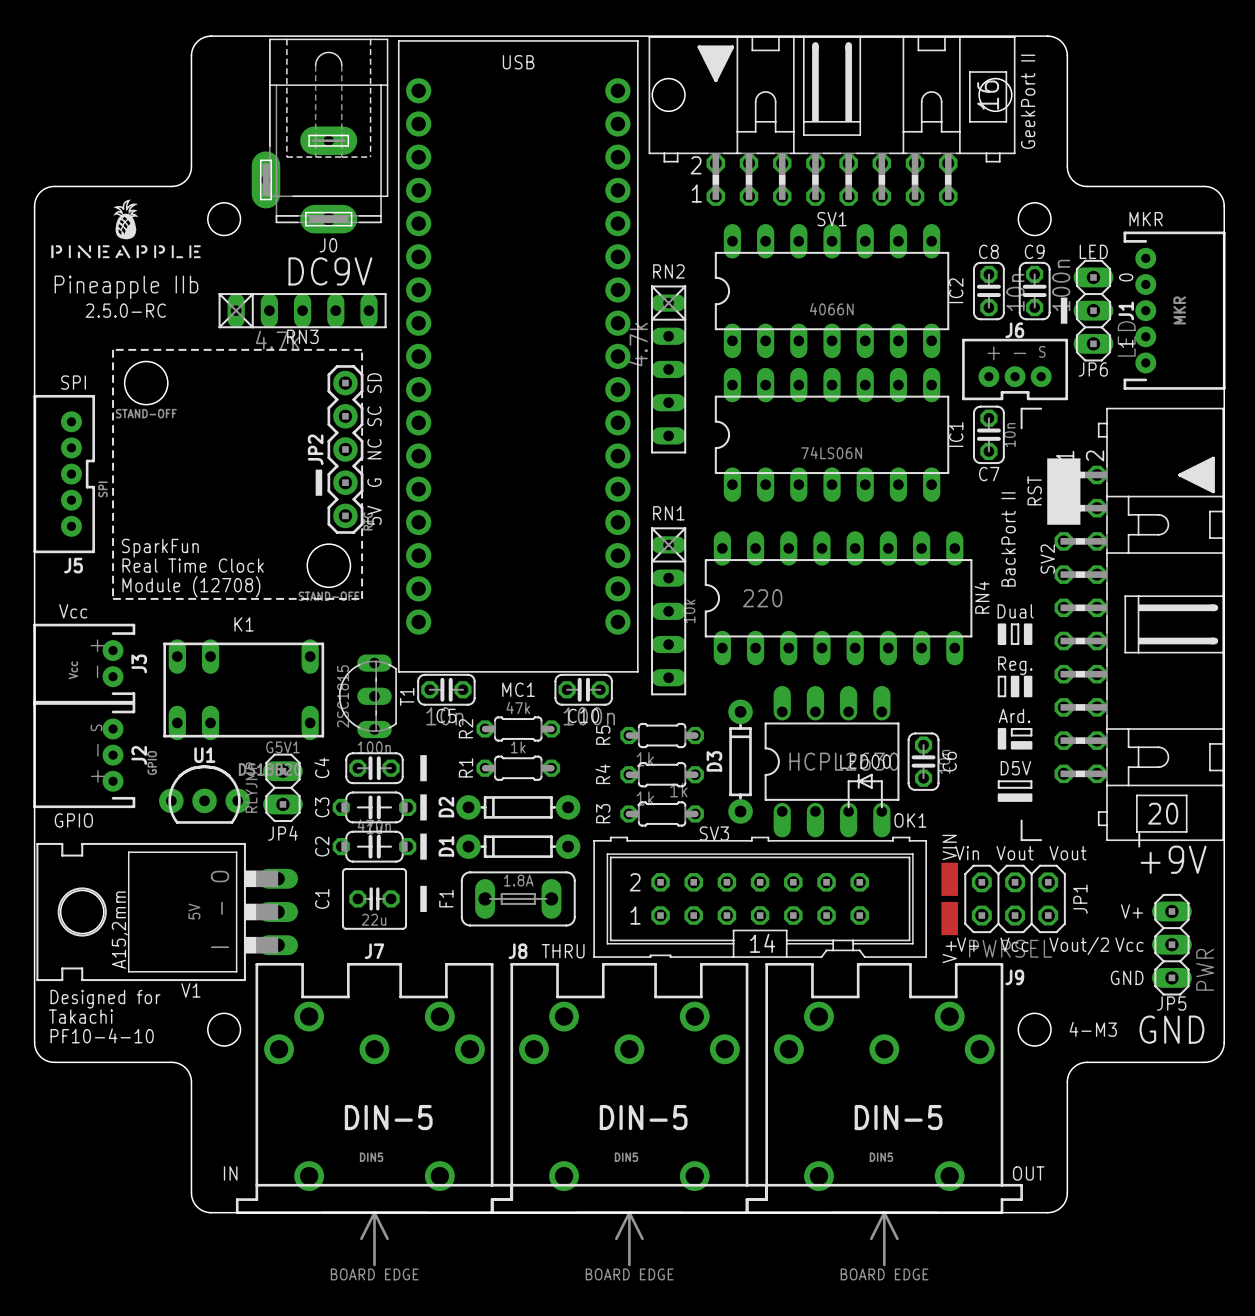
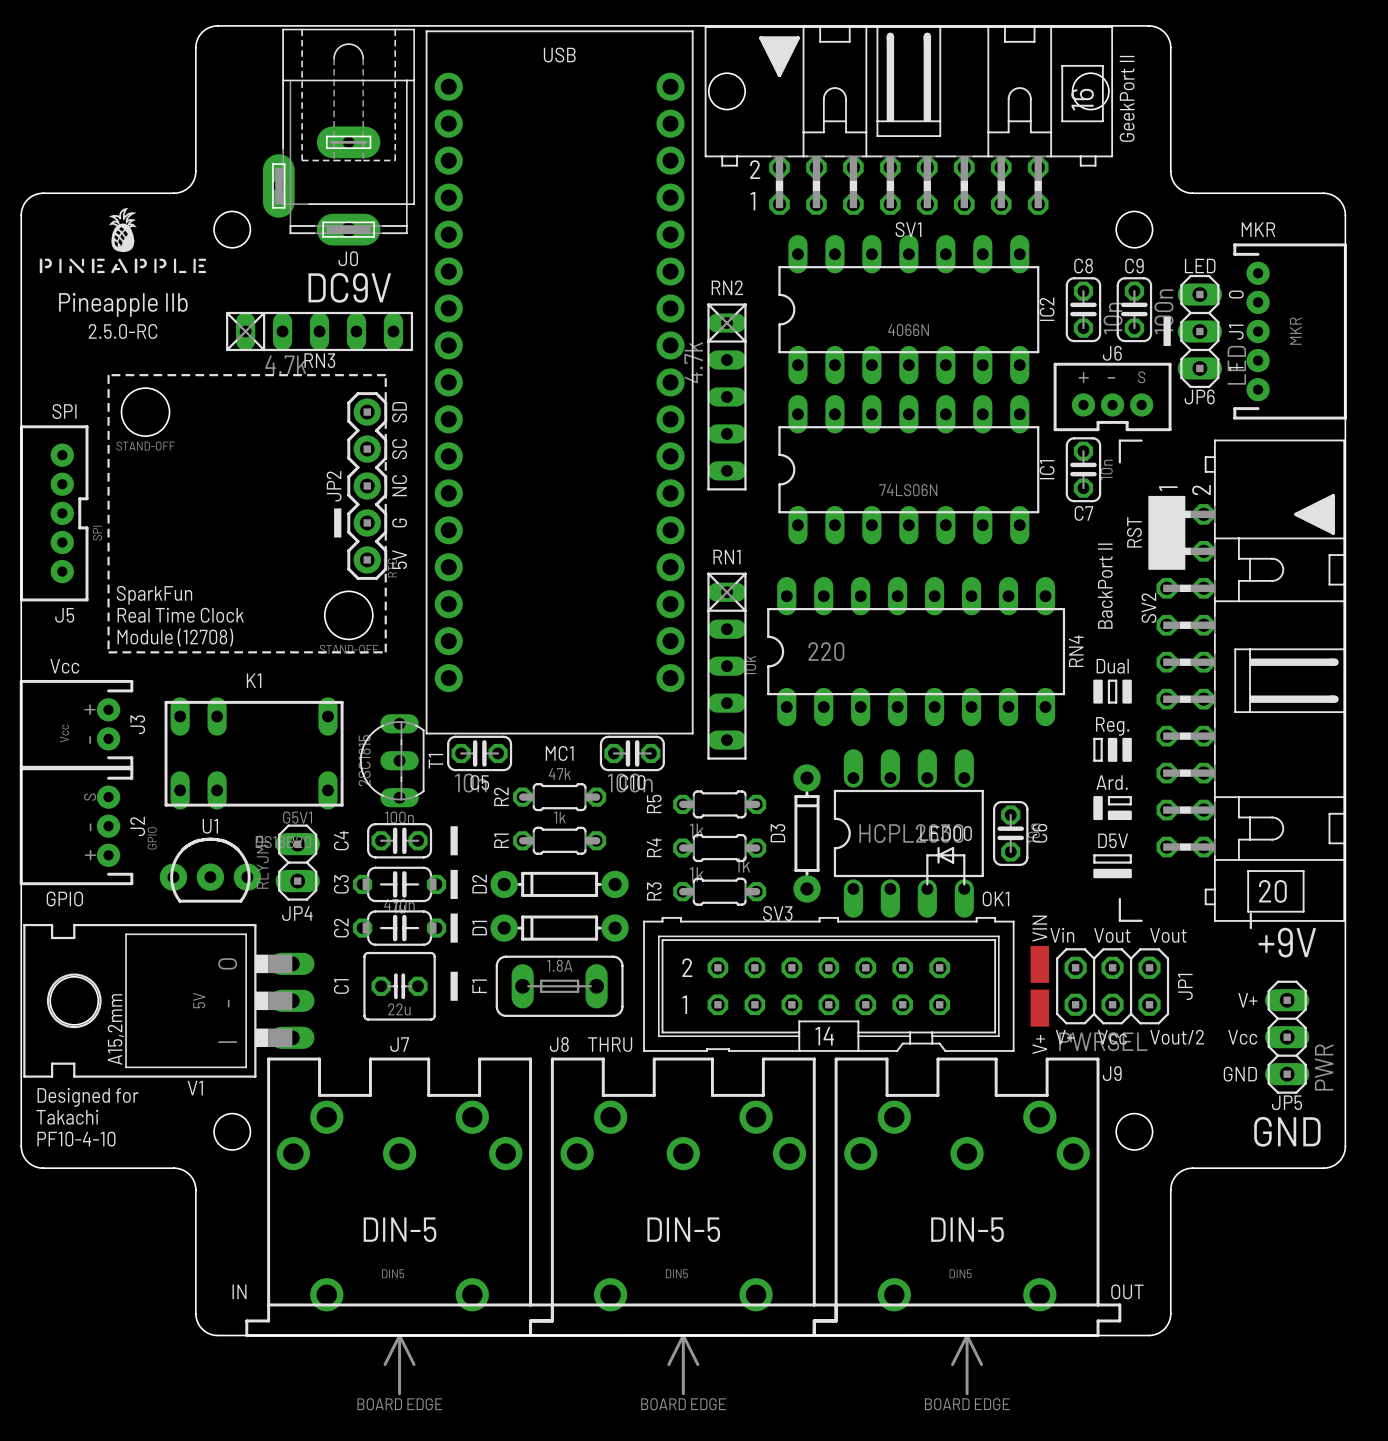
text: 4-M3 (1093, 1029) -> none

